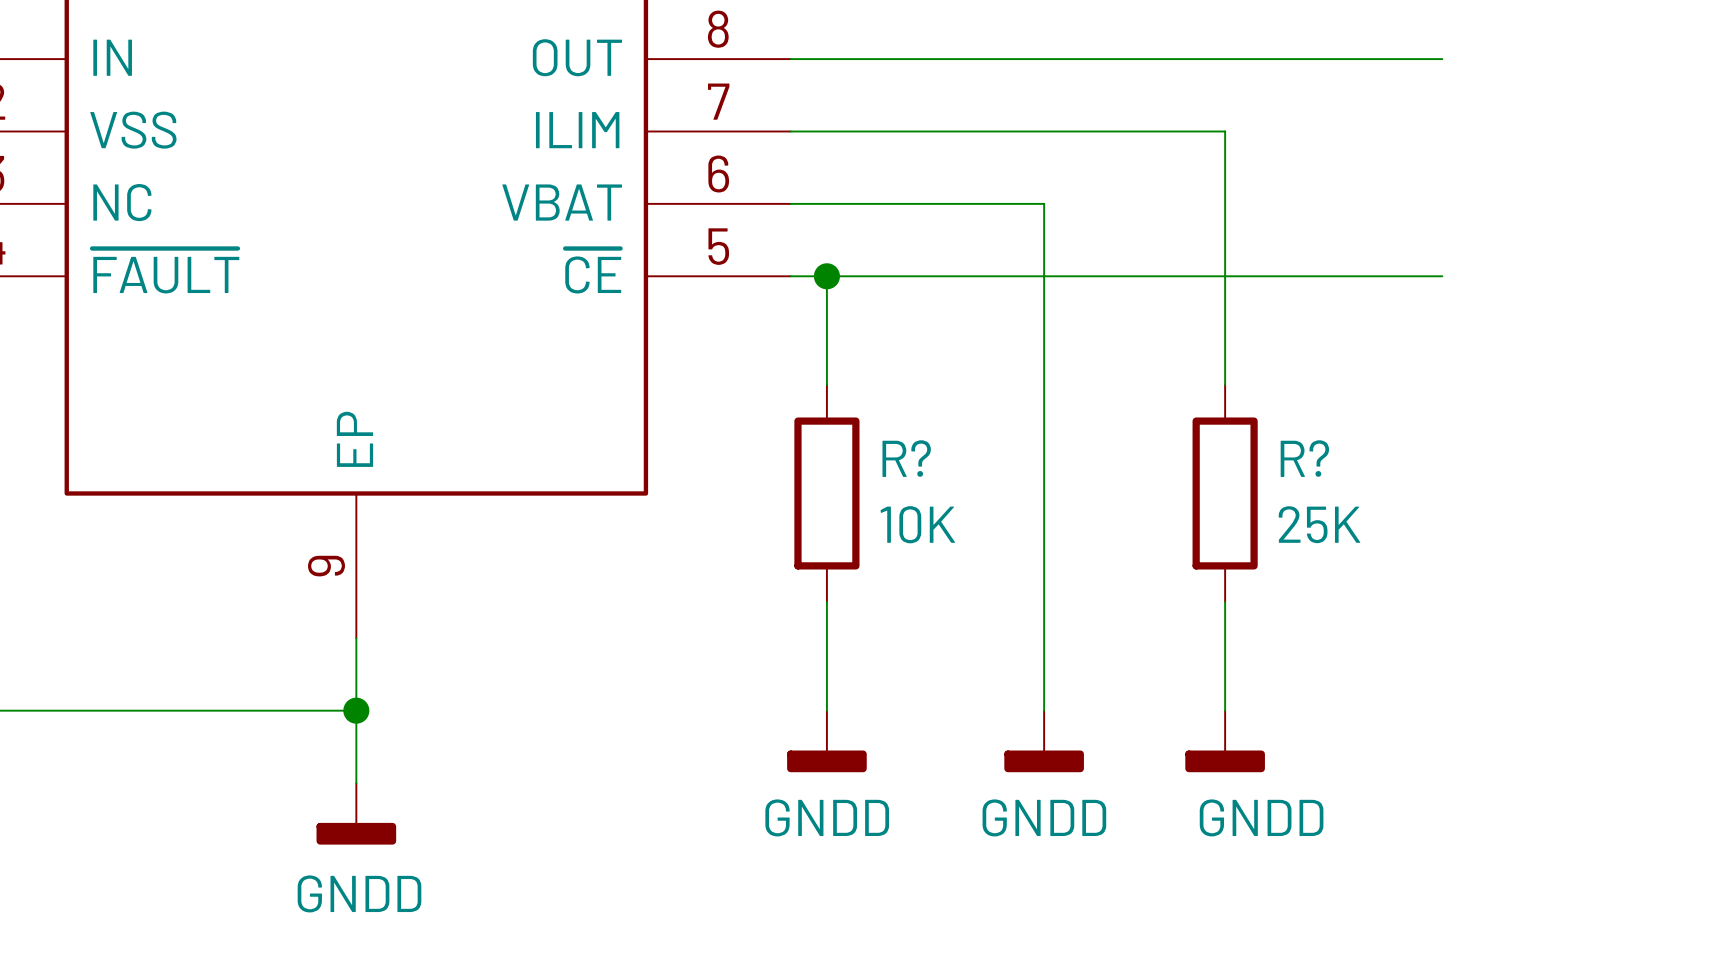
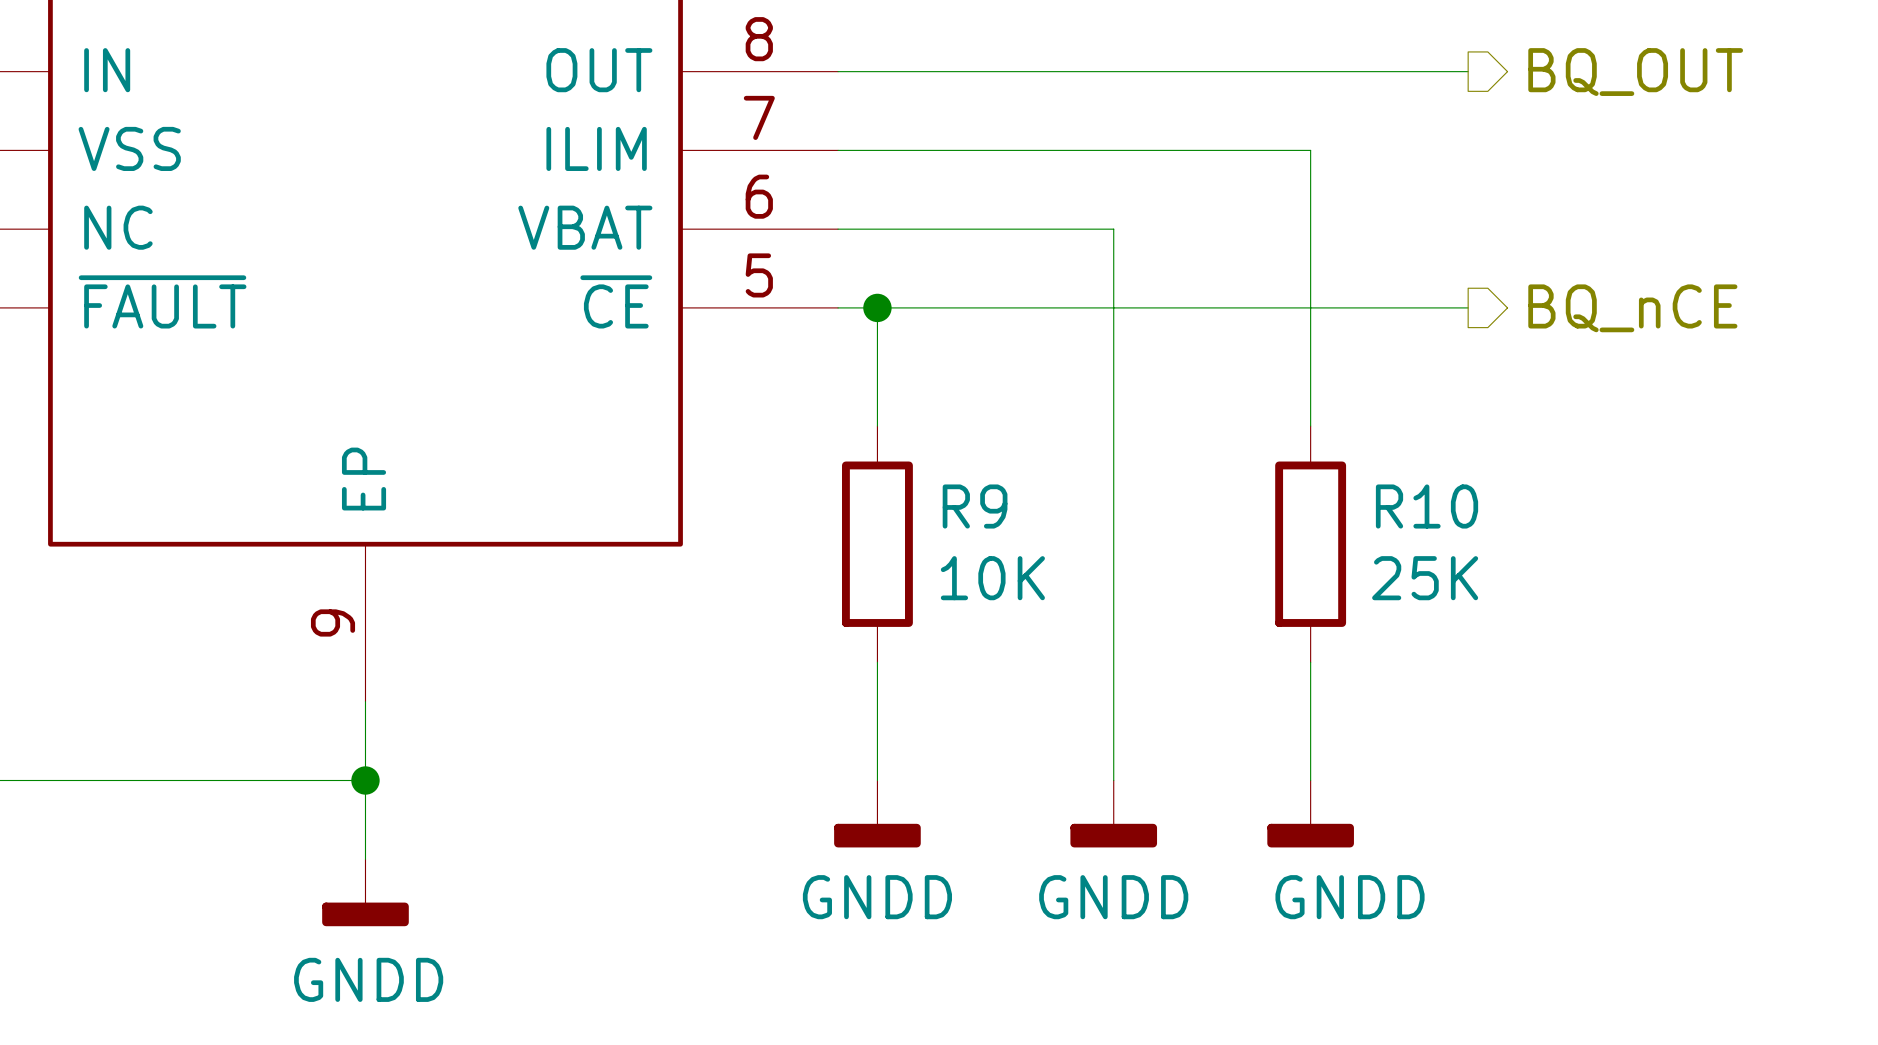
wire: (1369, 59) (1442, 59) -> none
hierarchical label: none -> BQ_OUT (1635, 72)
wire: (1369, 276) (1442, 276) -> none
hierarchical label: none -> BQ_nCE (1632, 308)
R? name: R? (906, 458) -> R9 (975, 506)
R? name: R? (1304, 458) -> R10 (1427, 506)

